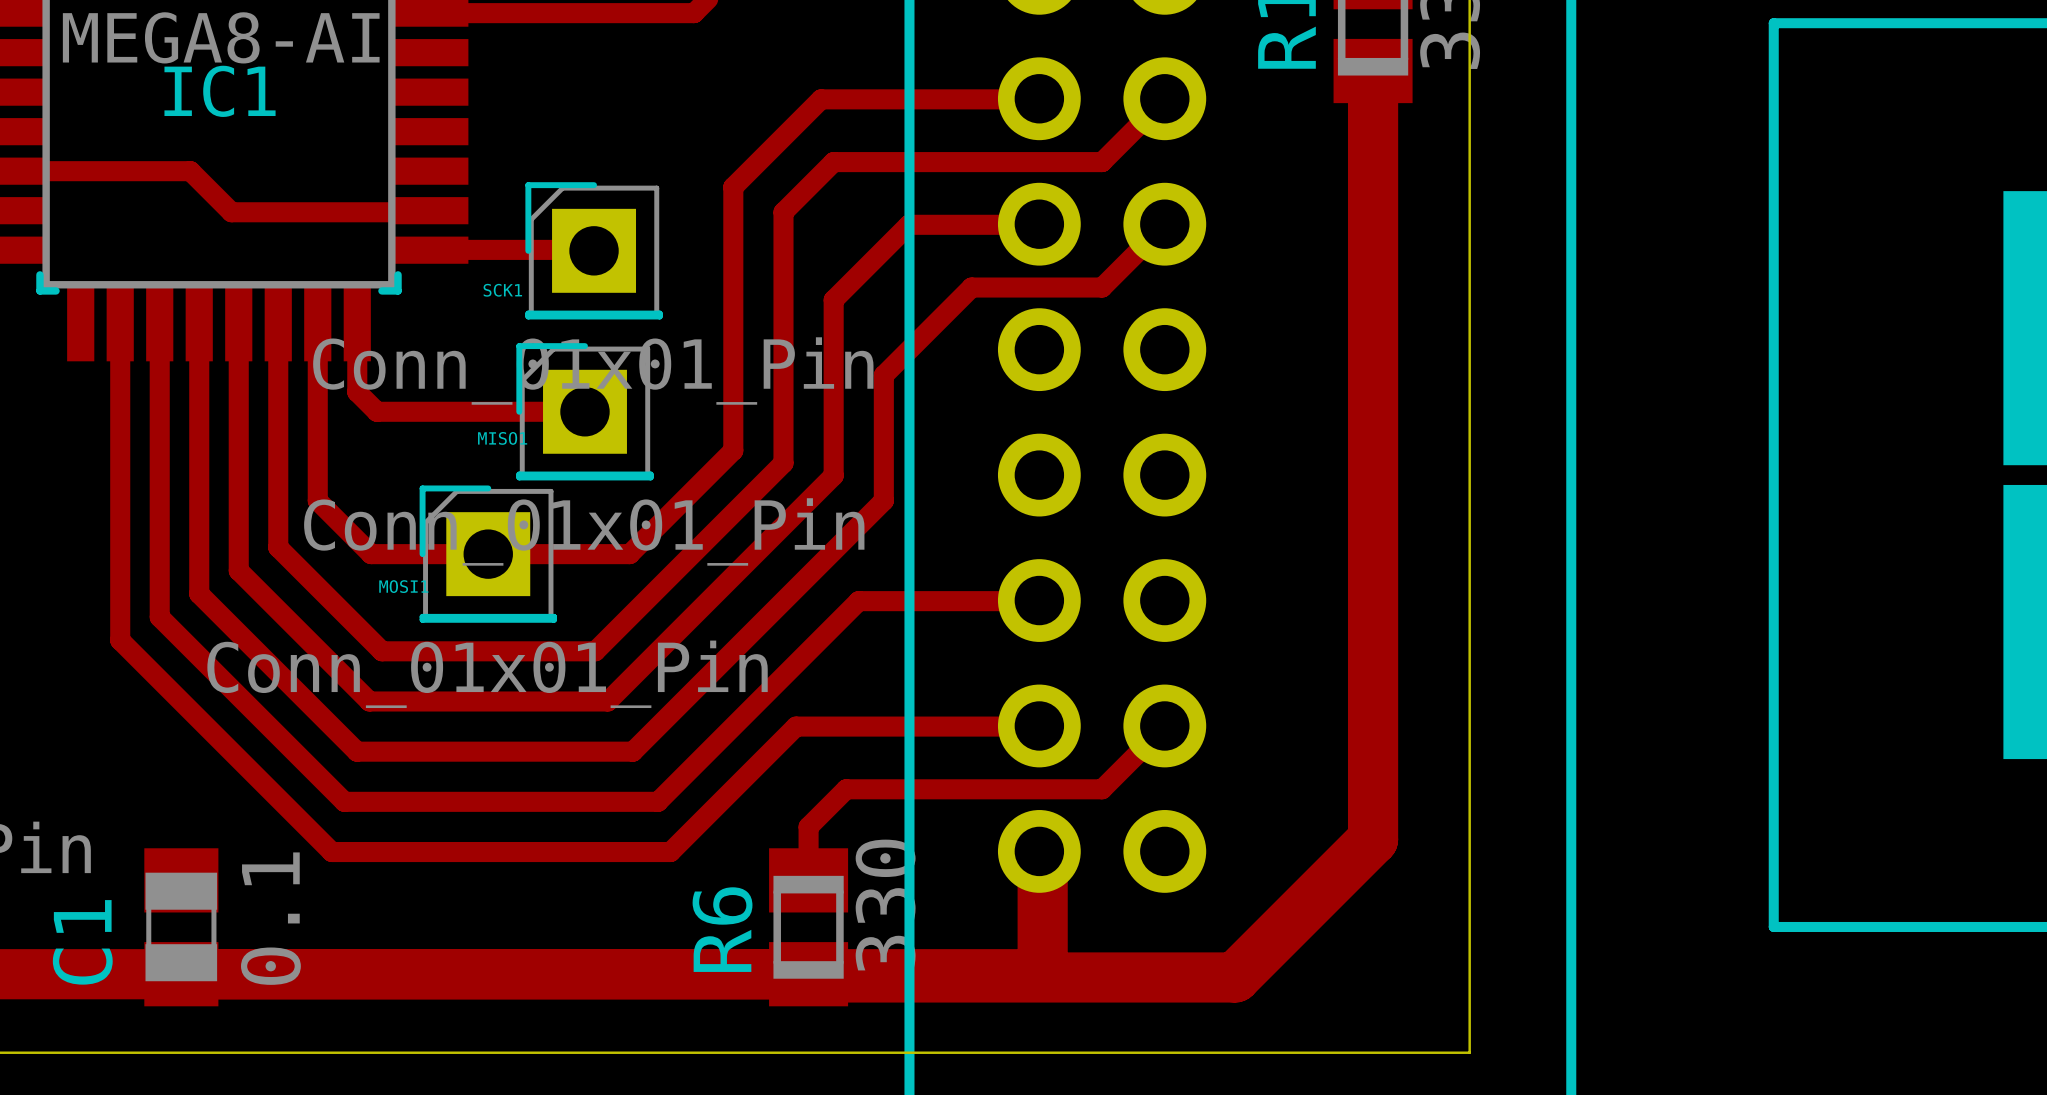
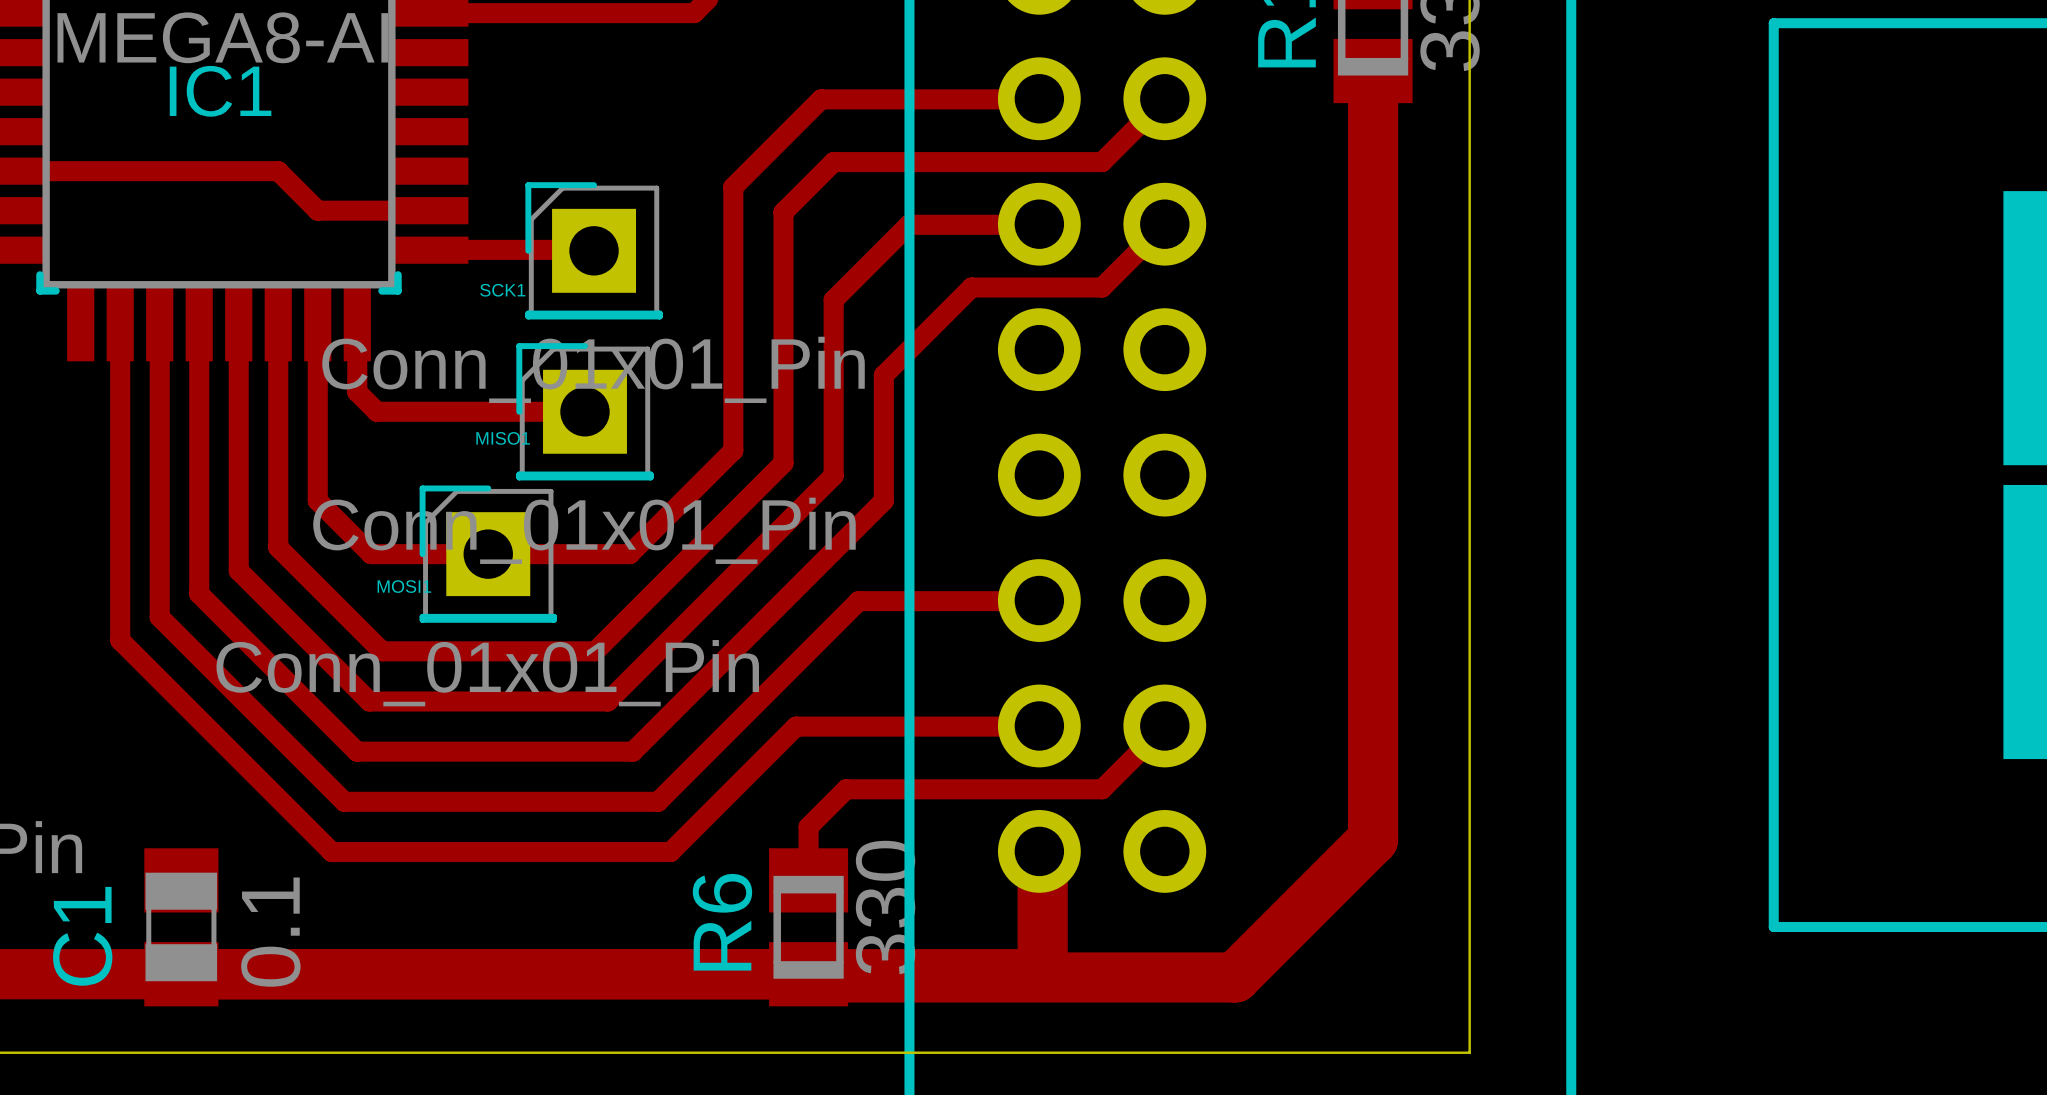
top track: (190, 171) (231, 212) (429, 212) (430, 210) -> (190, 171) (278, 171) (317, 210) (428, 210)

